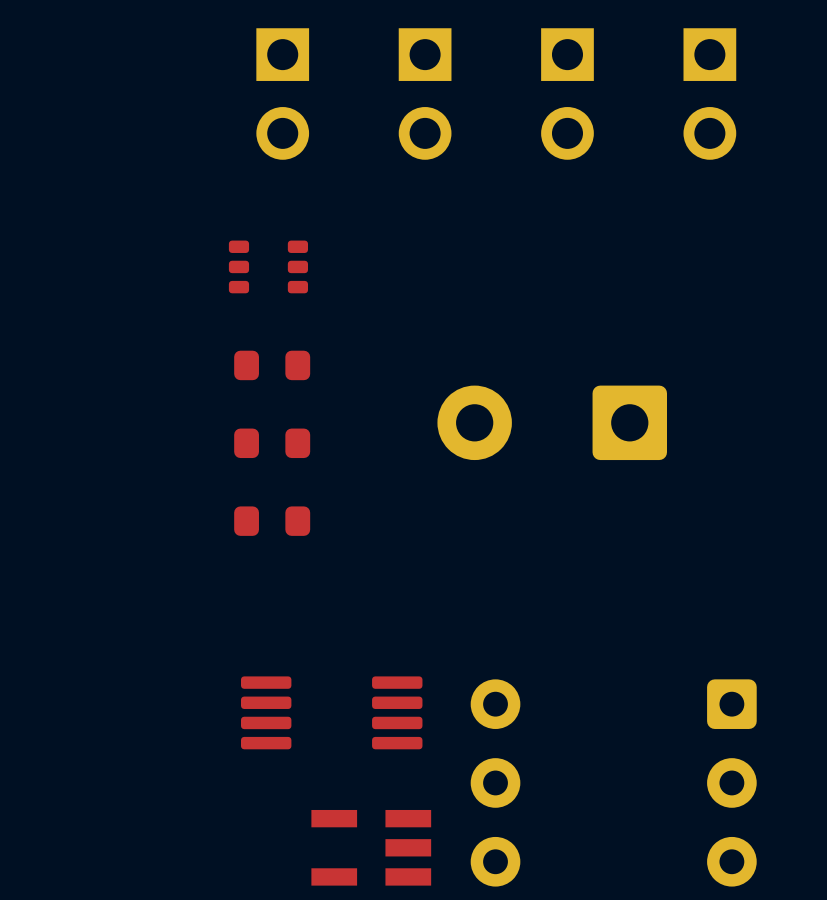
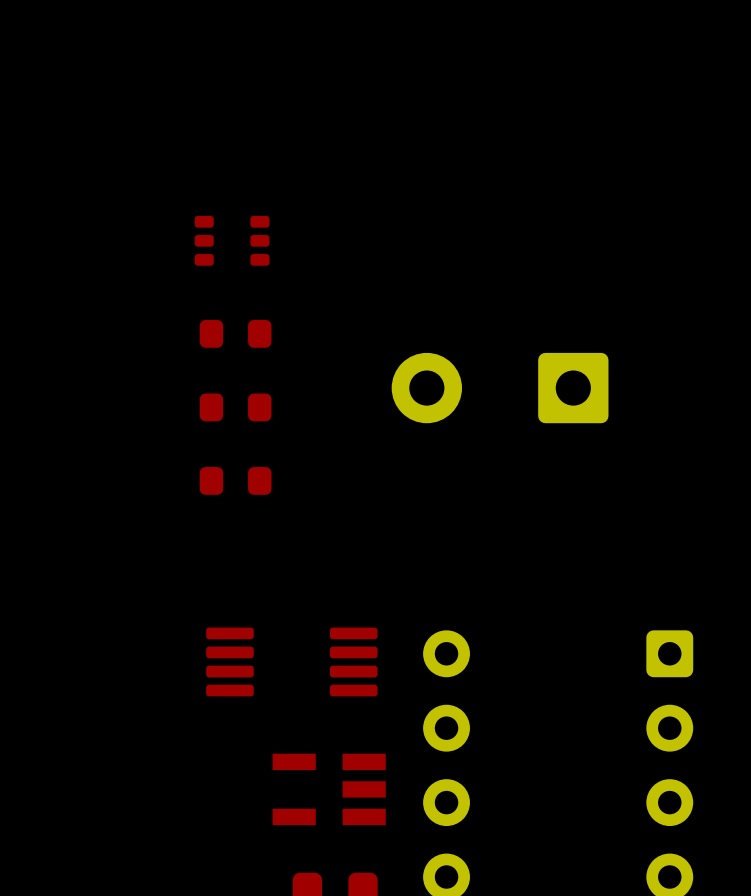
part: (282, 94) -> none
part: (425, 94) -> none
part: (567, 94) -> none
part: (709, 94) -> none

